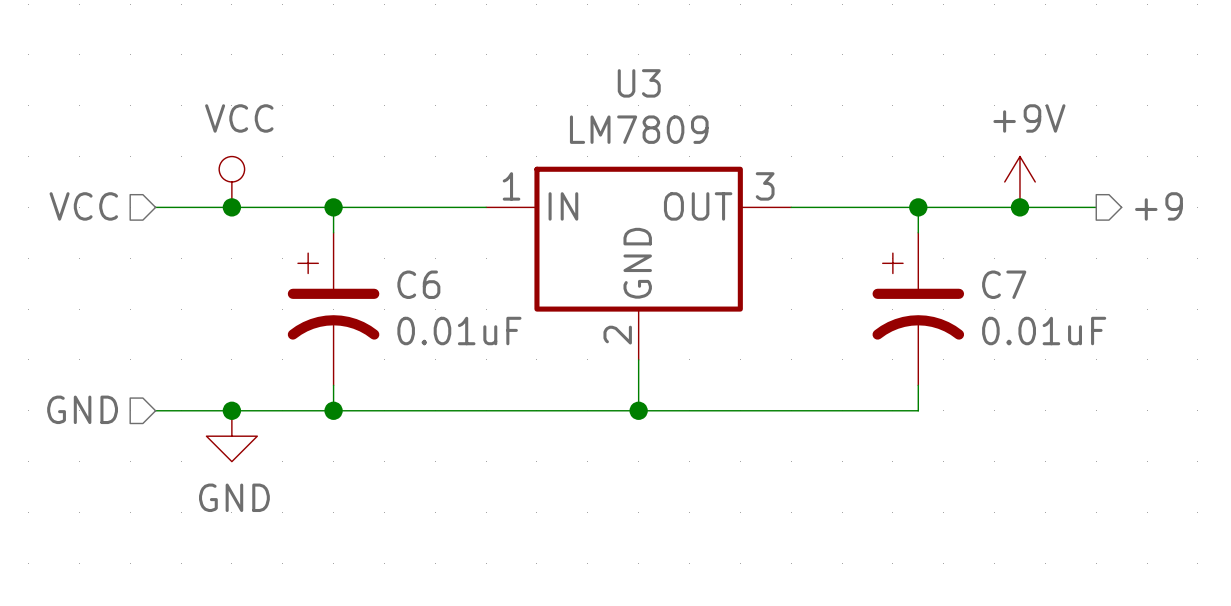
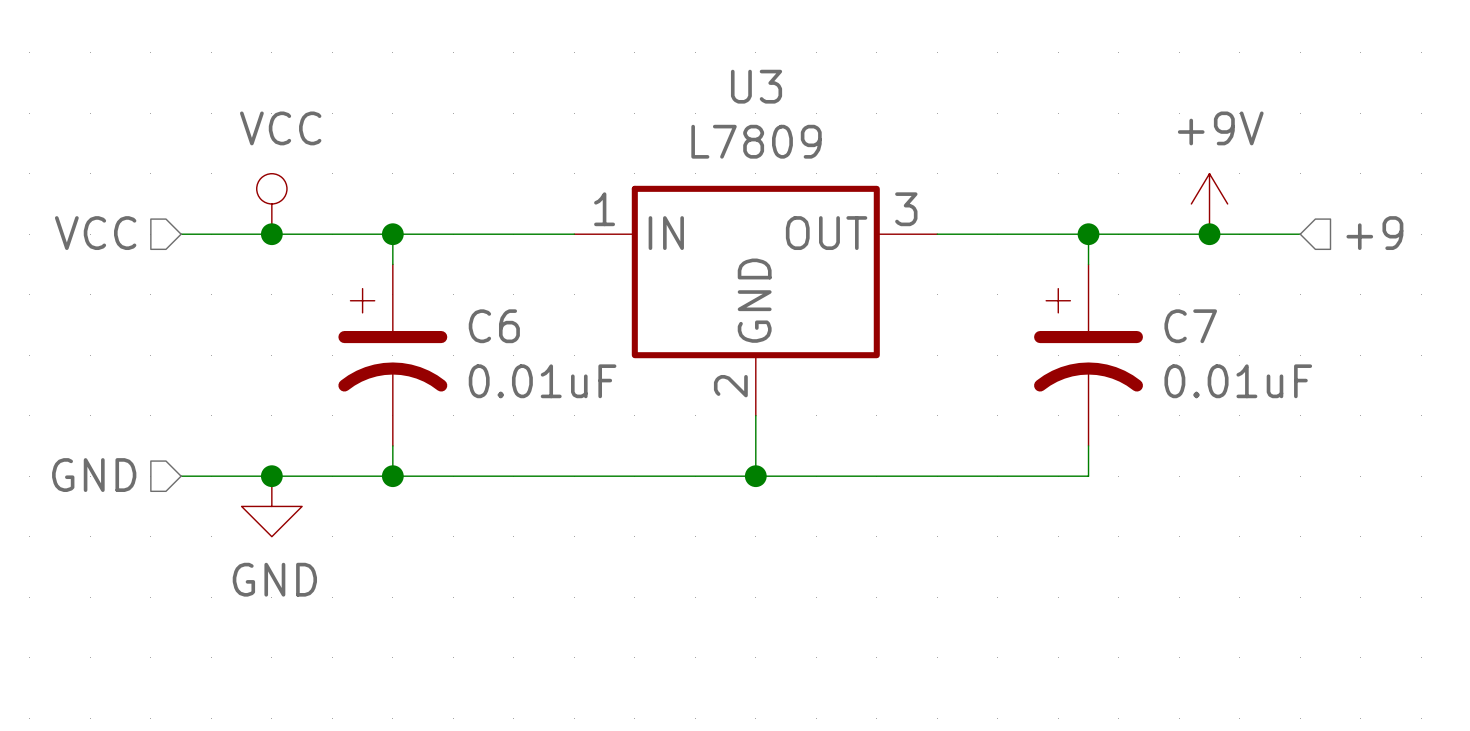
U3 value: LM7809 (639, 129) -> L7809 (756, 141)
hierarchical label shape: output (1159, 206) -> input (1374, 233)

